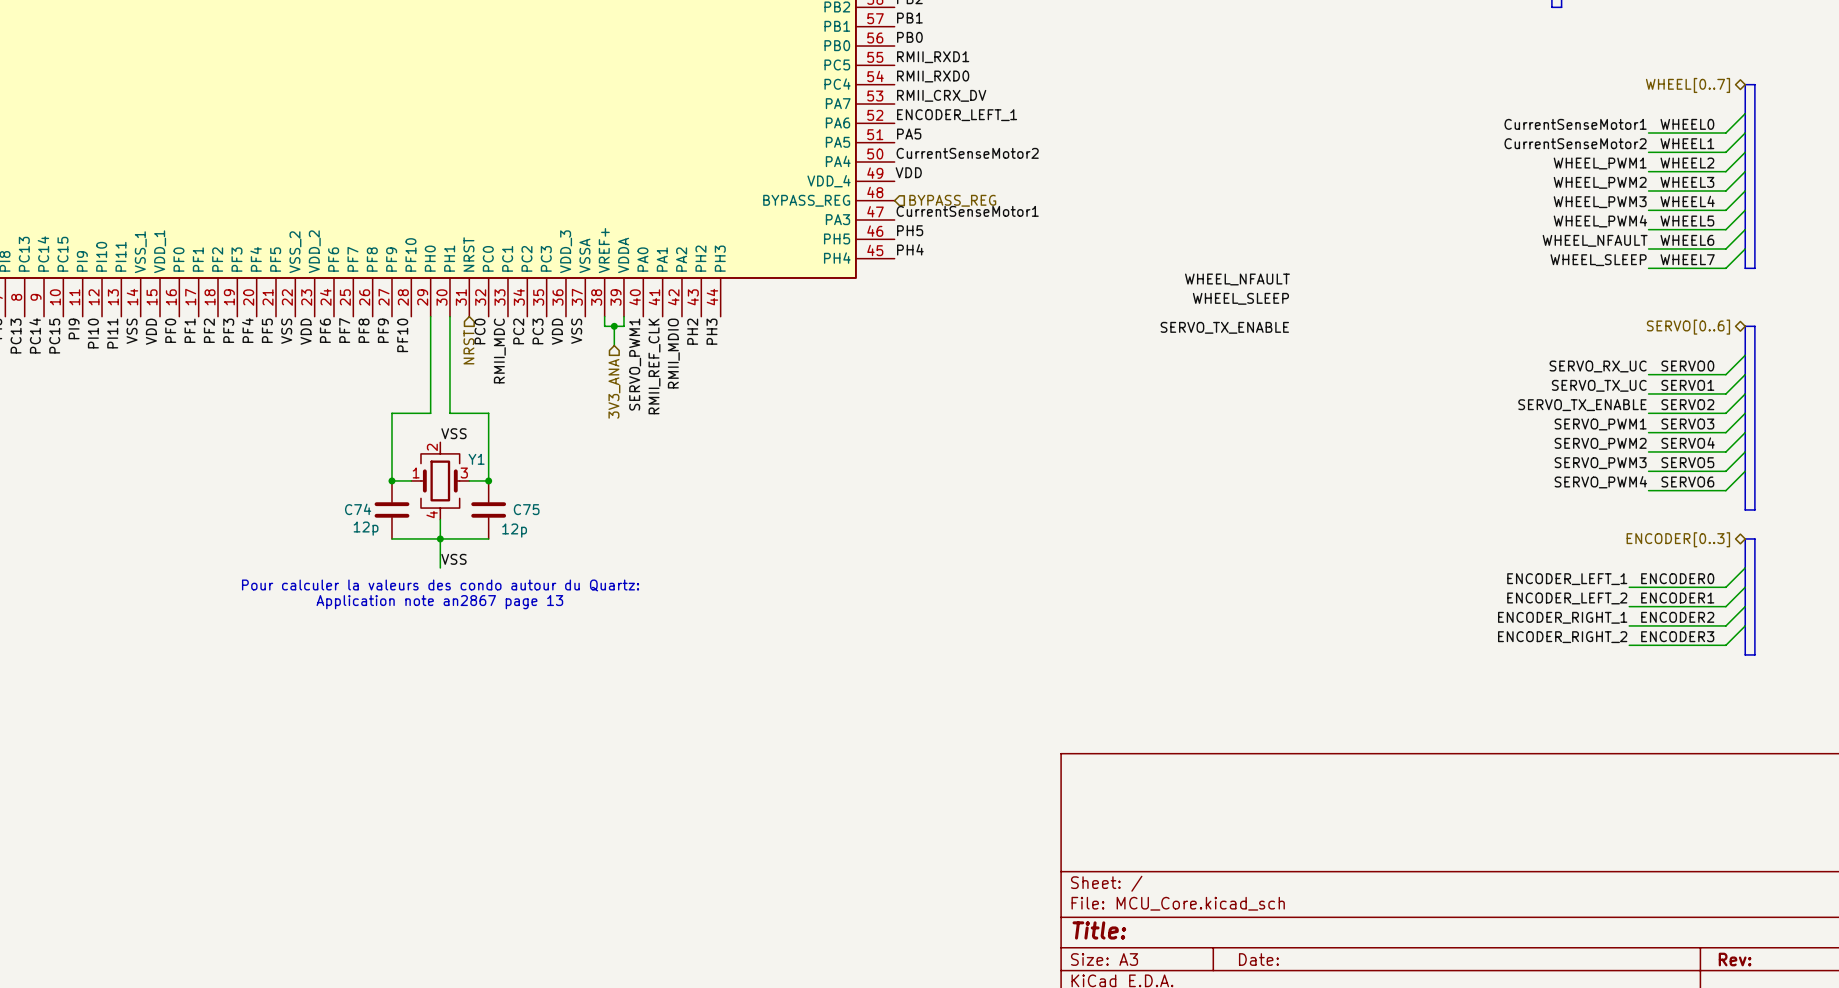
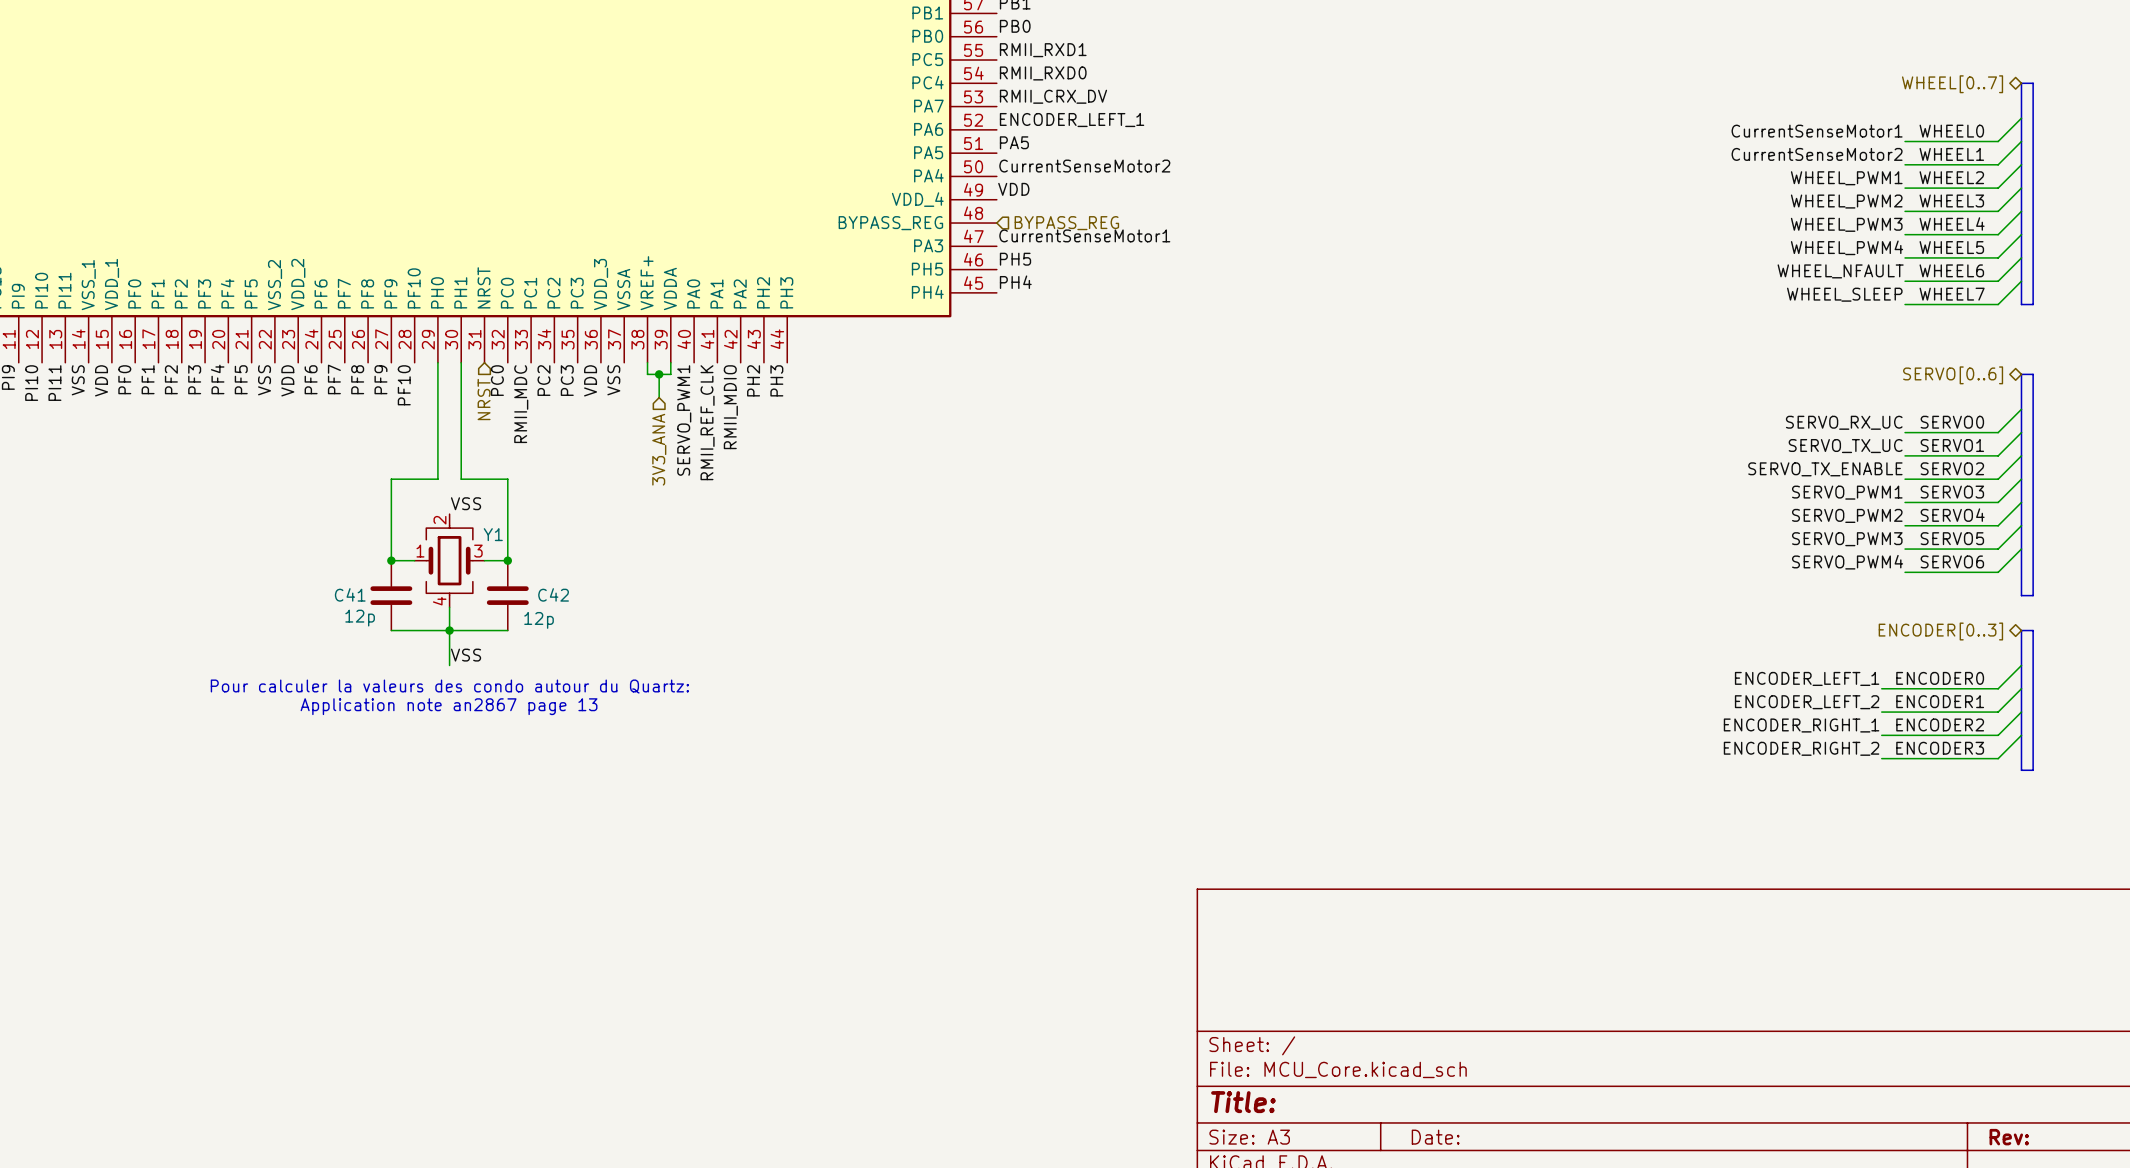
label: WHEEL_NFAULT (1237, 279) -> none
label: WHEEL_SLEEP (1240, 298) -> none
label: SERVO_TX_ENABLE (1224, 327) -> none
C74 name: C74 (358, 509) -> C41 (350, 594)
C75 name: C75 (526, 509) -> C42 (553, 594)

